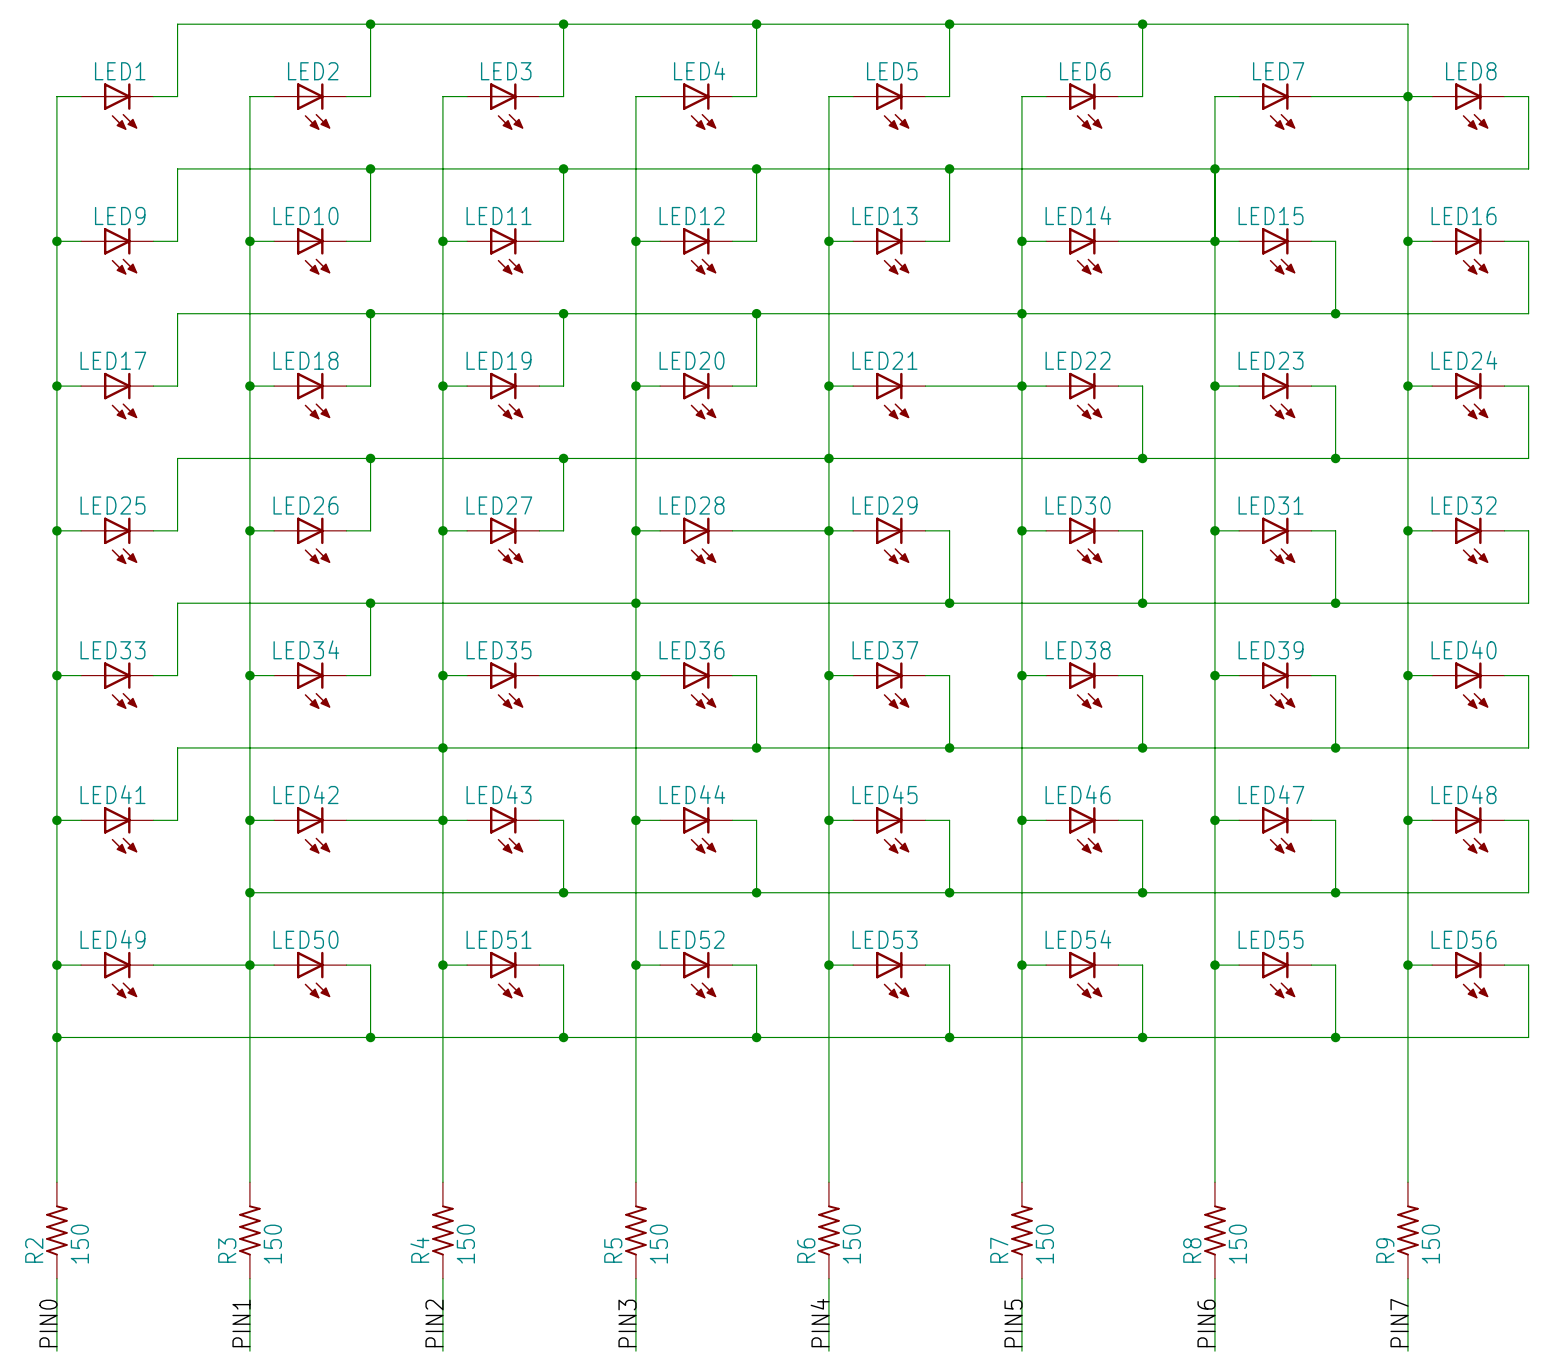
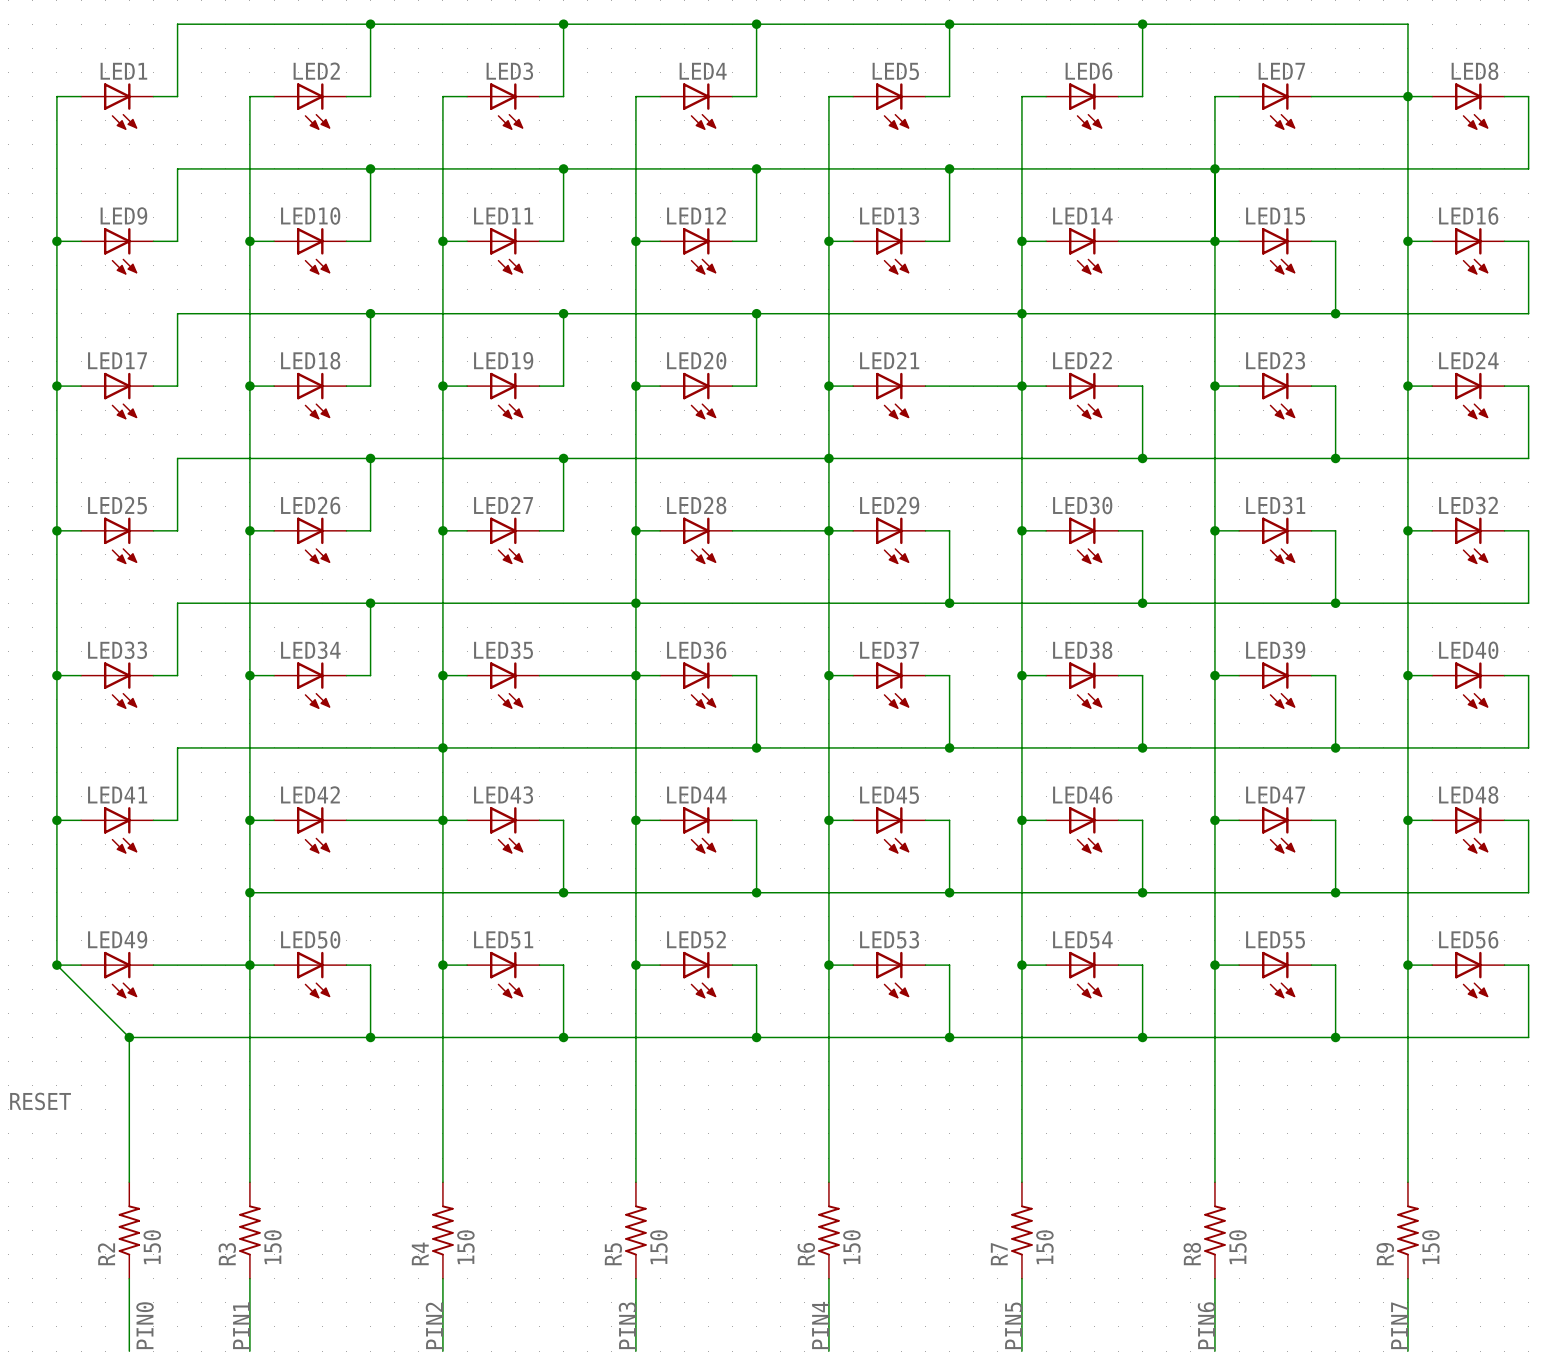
wire: (56, 965) (56, 1182) -> (56, 965) (129, 1037) (129, 1182)
wire: (56, 1037) (129, 1037) -> none
junction: (56, 1037) -> none
junction: none -> (129, 1037)
label: none -> RESET (40, 1101)
R2 position: (56, 1230) -> (129, 1230)
wire: (56, 1278) (56, 1351) -> (129, 1278) (129, 1351)
label position: PIN0 (48, 1323) -> PIN0 (145, 1325)

